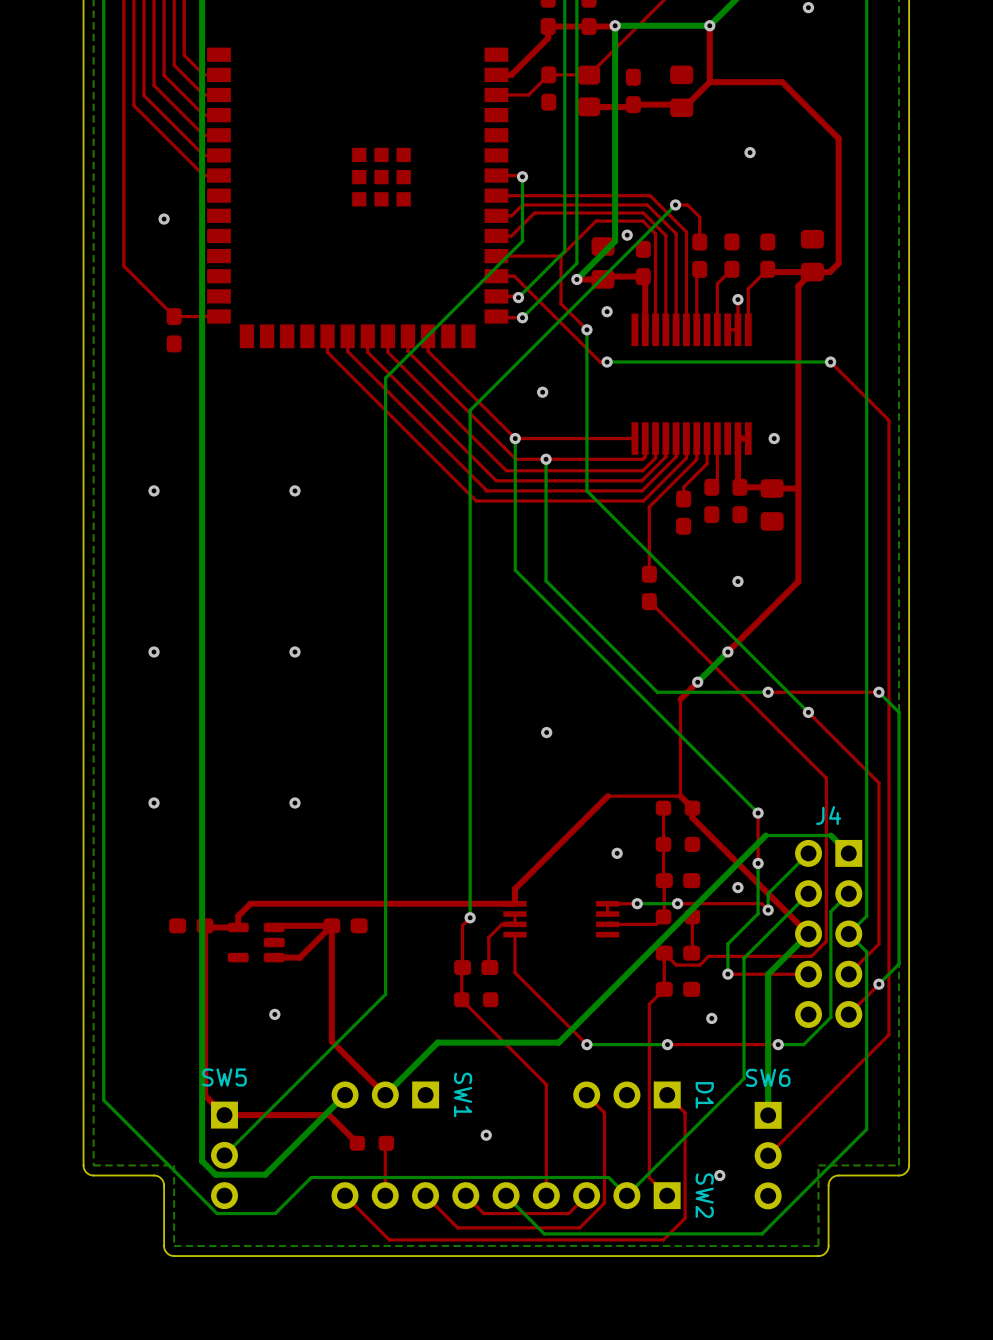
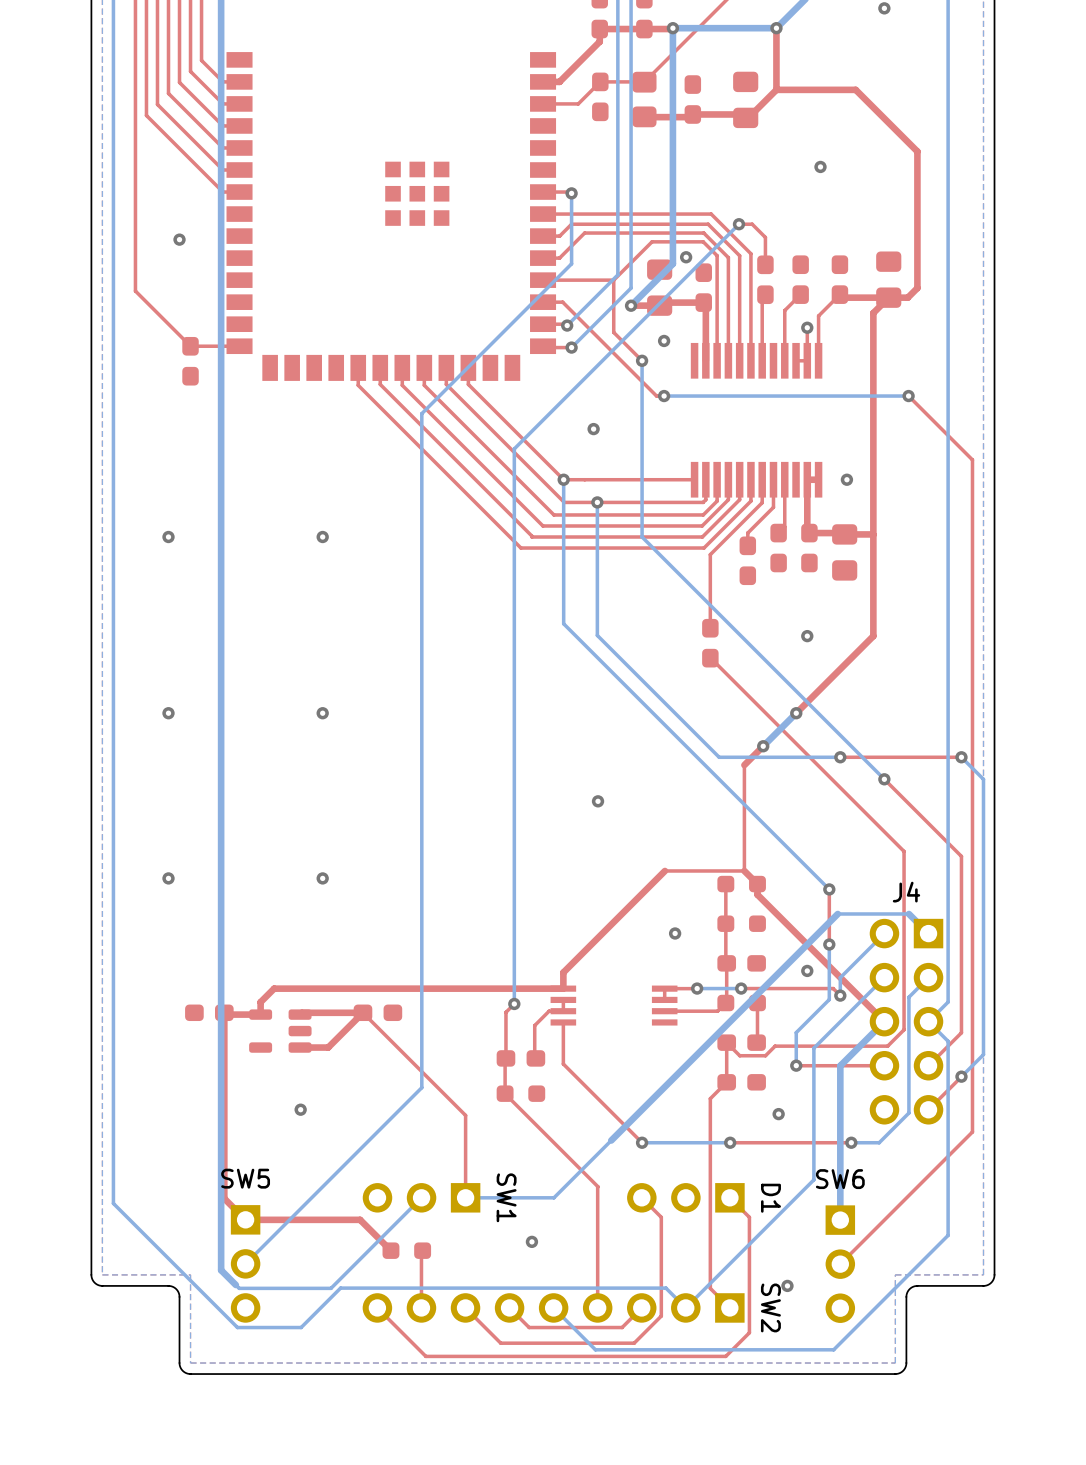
top track: (331, 925) (331, 1041) (385, 1094) -> (362, 1012) (465, 1115) (465, 1197)
bottom track: (558, 1042) (437, 1042) (385, 1094) -> (611, 1140) (553, 1197) (465, 1197)
bottom track: (345, 1094) (265, 1174) (215, 1174) -> (421, 1197) (331, 1288) (239, 1288) (235, 1285)

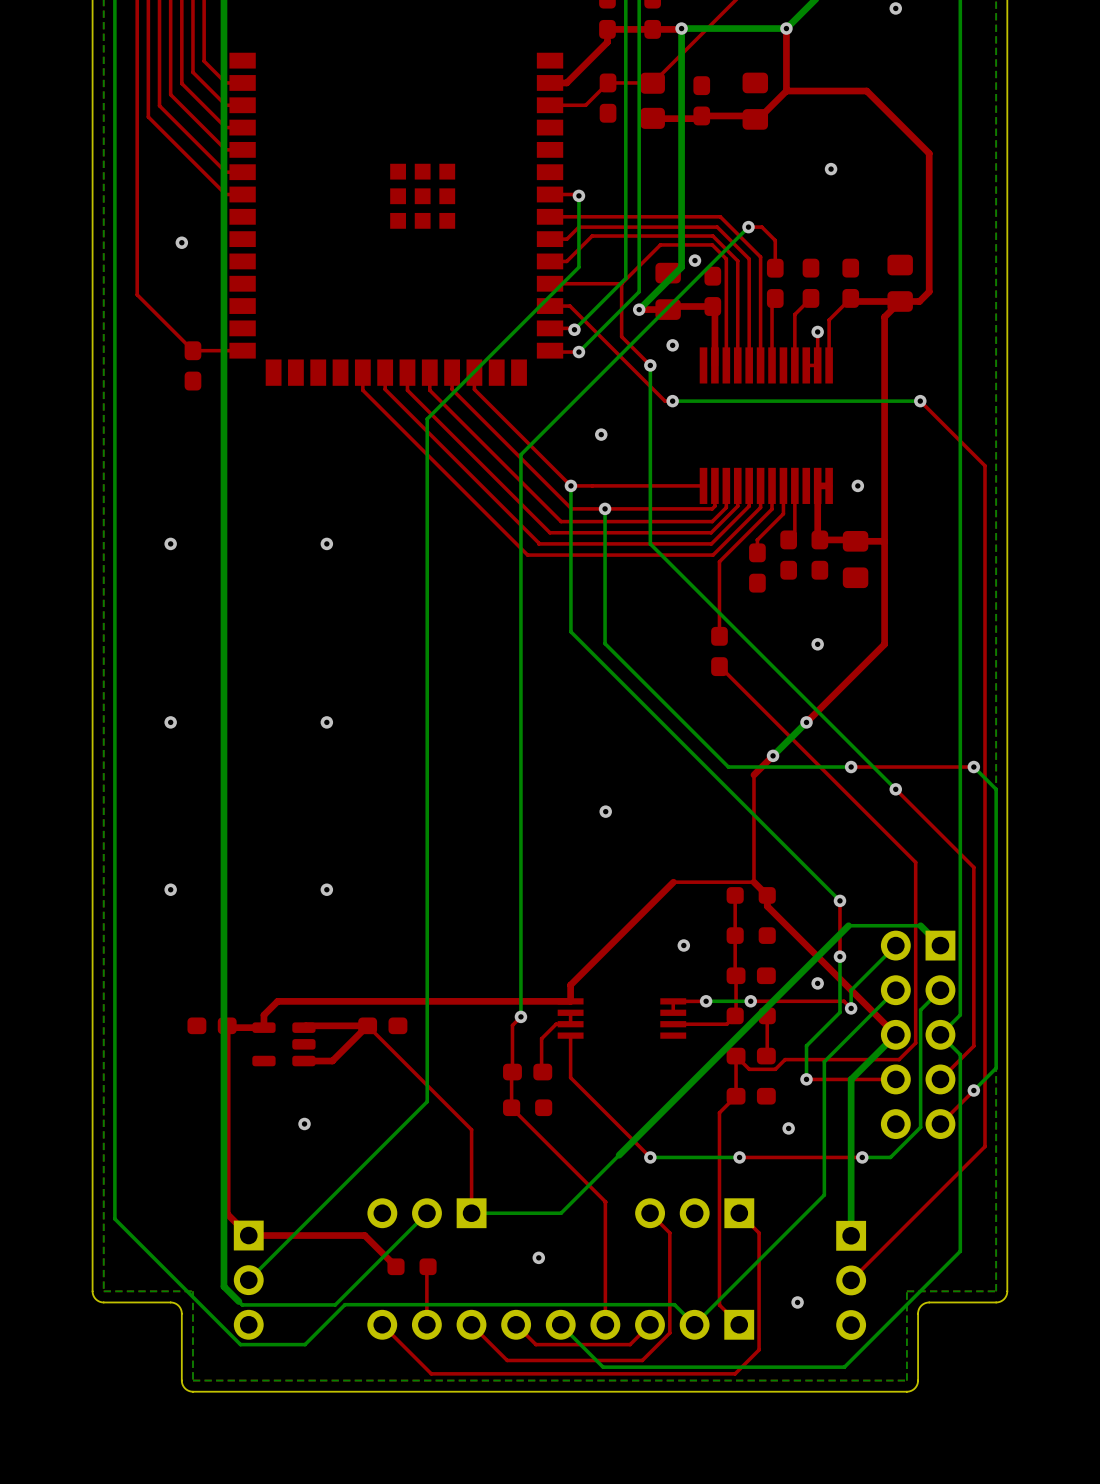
J4 name: J4 (906, 892) -> none
text: SW5 (245, 1178) -> none
text: SW6 (840, 1179) -> none
text: SW1 (506, 1197) -> none
D1 name: D1 (770, 1198) -> none
text: SW2 (770, 1307) -> none

